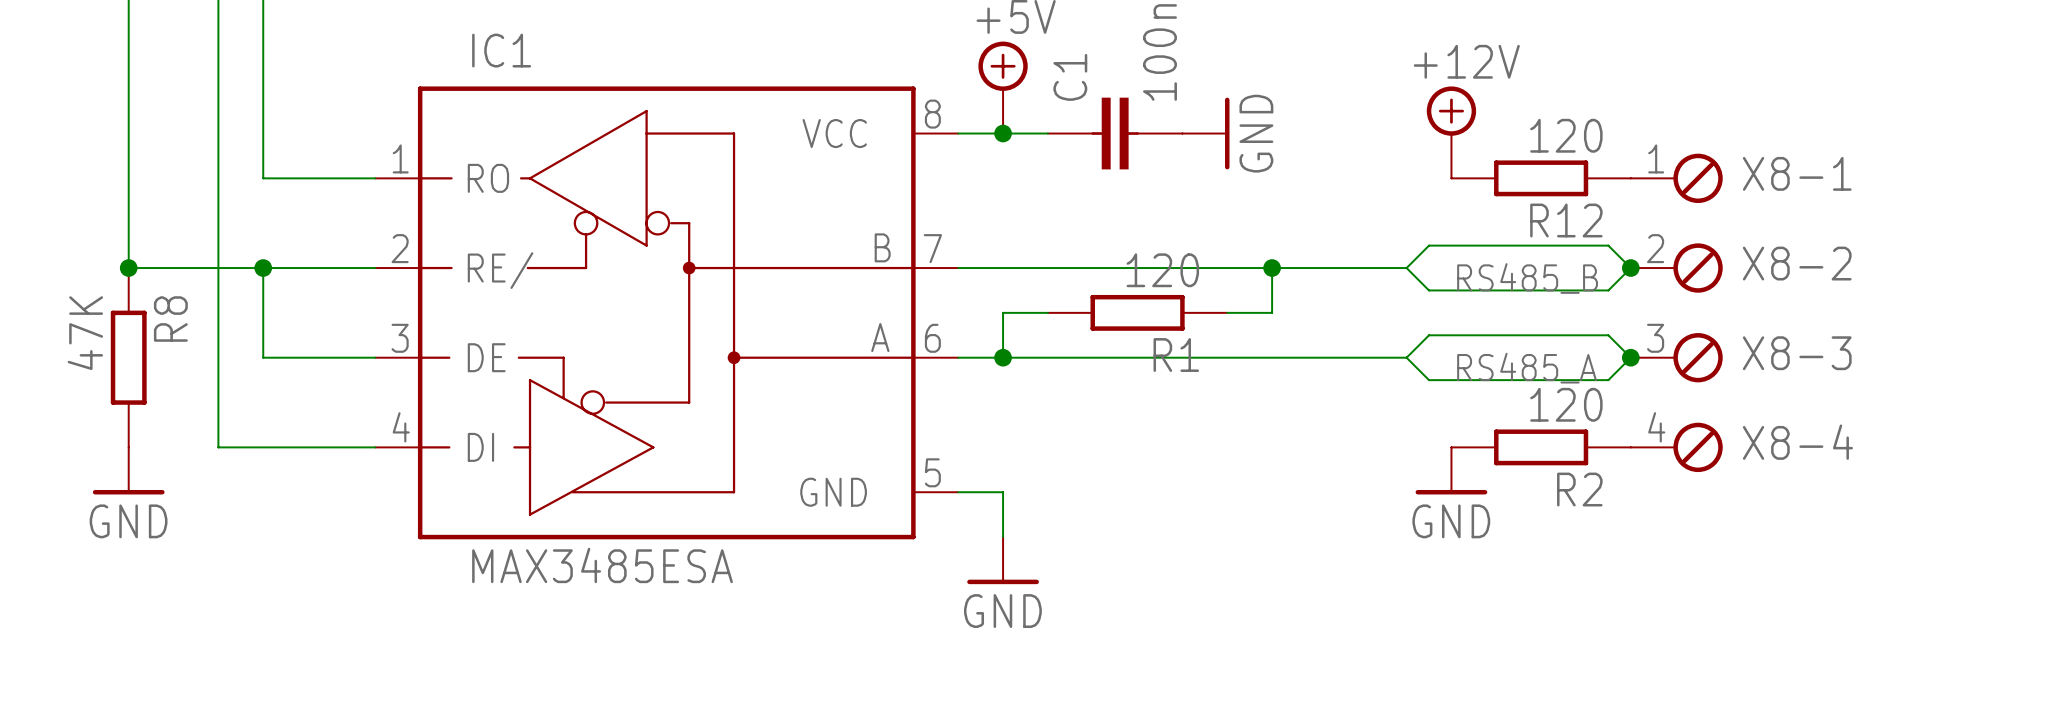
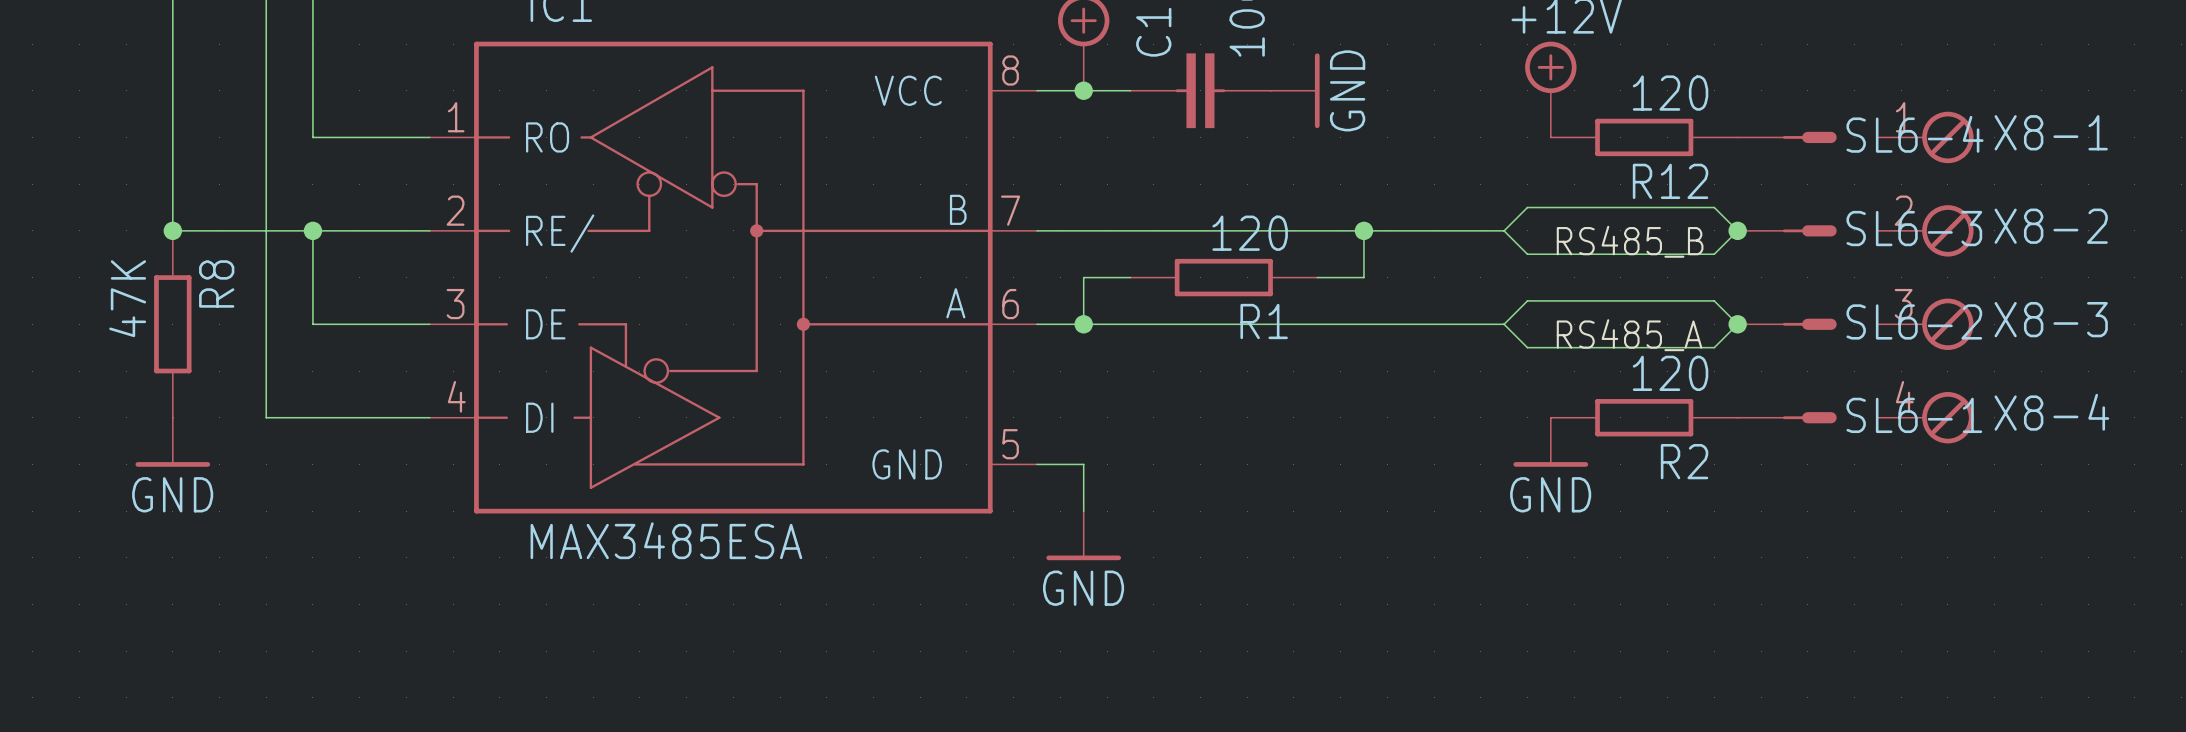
X8-1 position: (1676, 178) -> (1925, 137)
SL6-4: none -> (1787, 137)
X8-2 position: (1676, 268) -> (1925, 230)
SL6-3: none -> (1787, 230)
X8-3 position: (1676, 357) -> (1925, 324)
SL6-2: none -> (1787, 324)
X8-4 position: (1676, 447) -> (1925, 417)
SL6-1: none -> (1787, 417)

